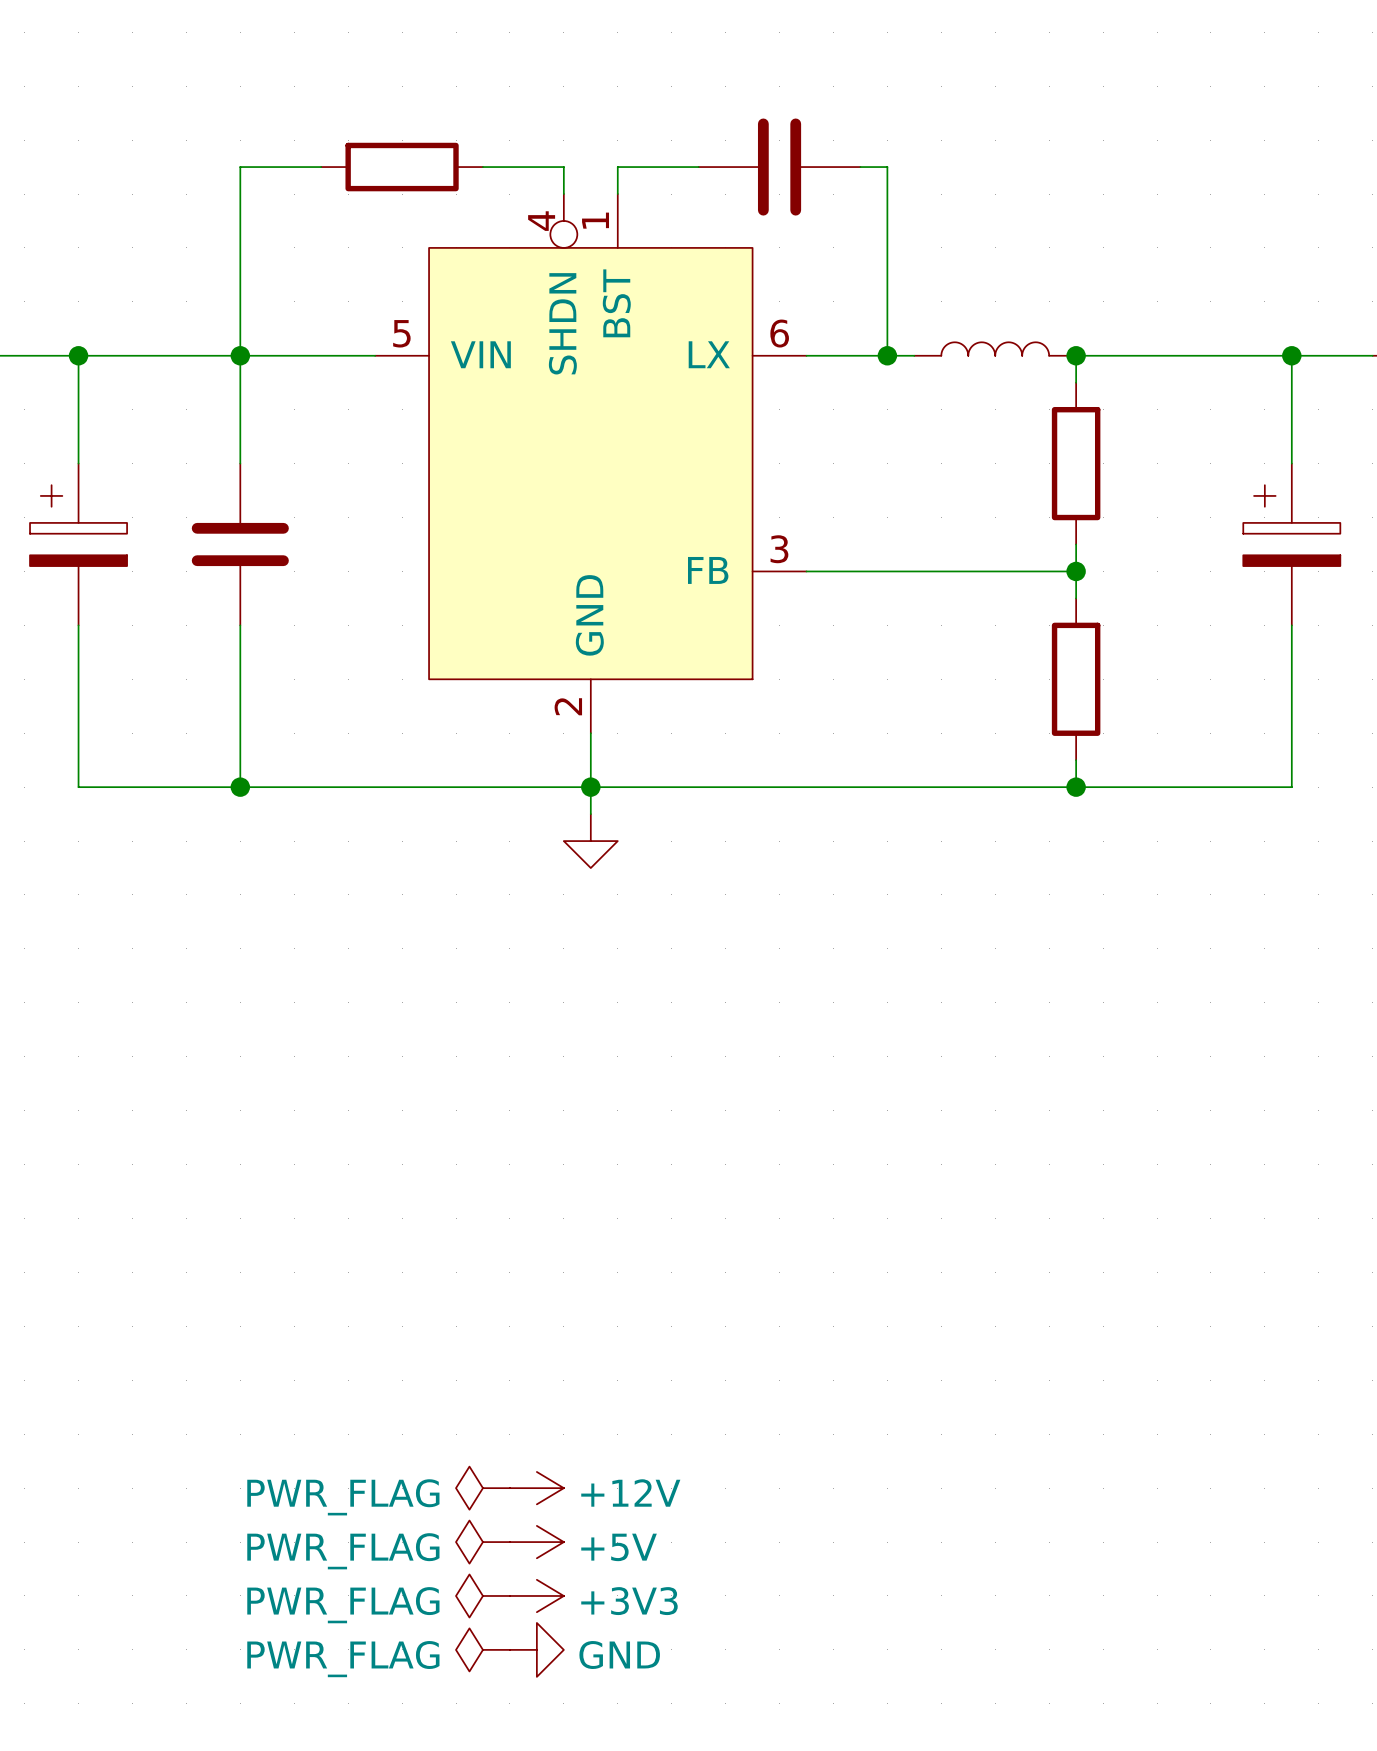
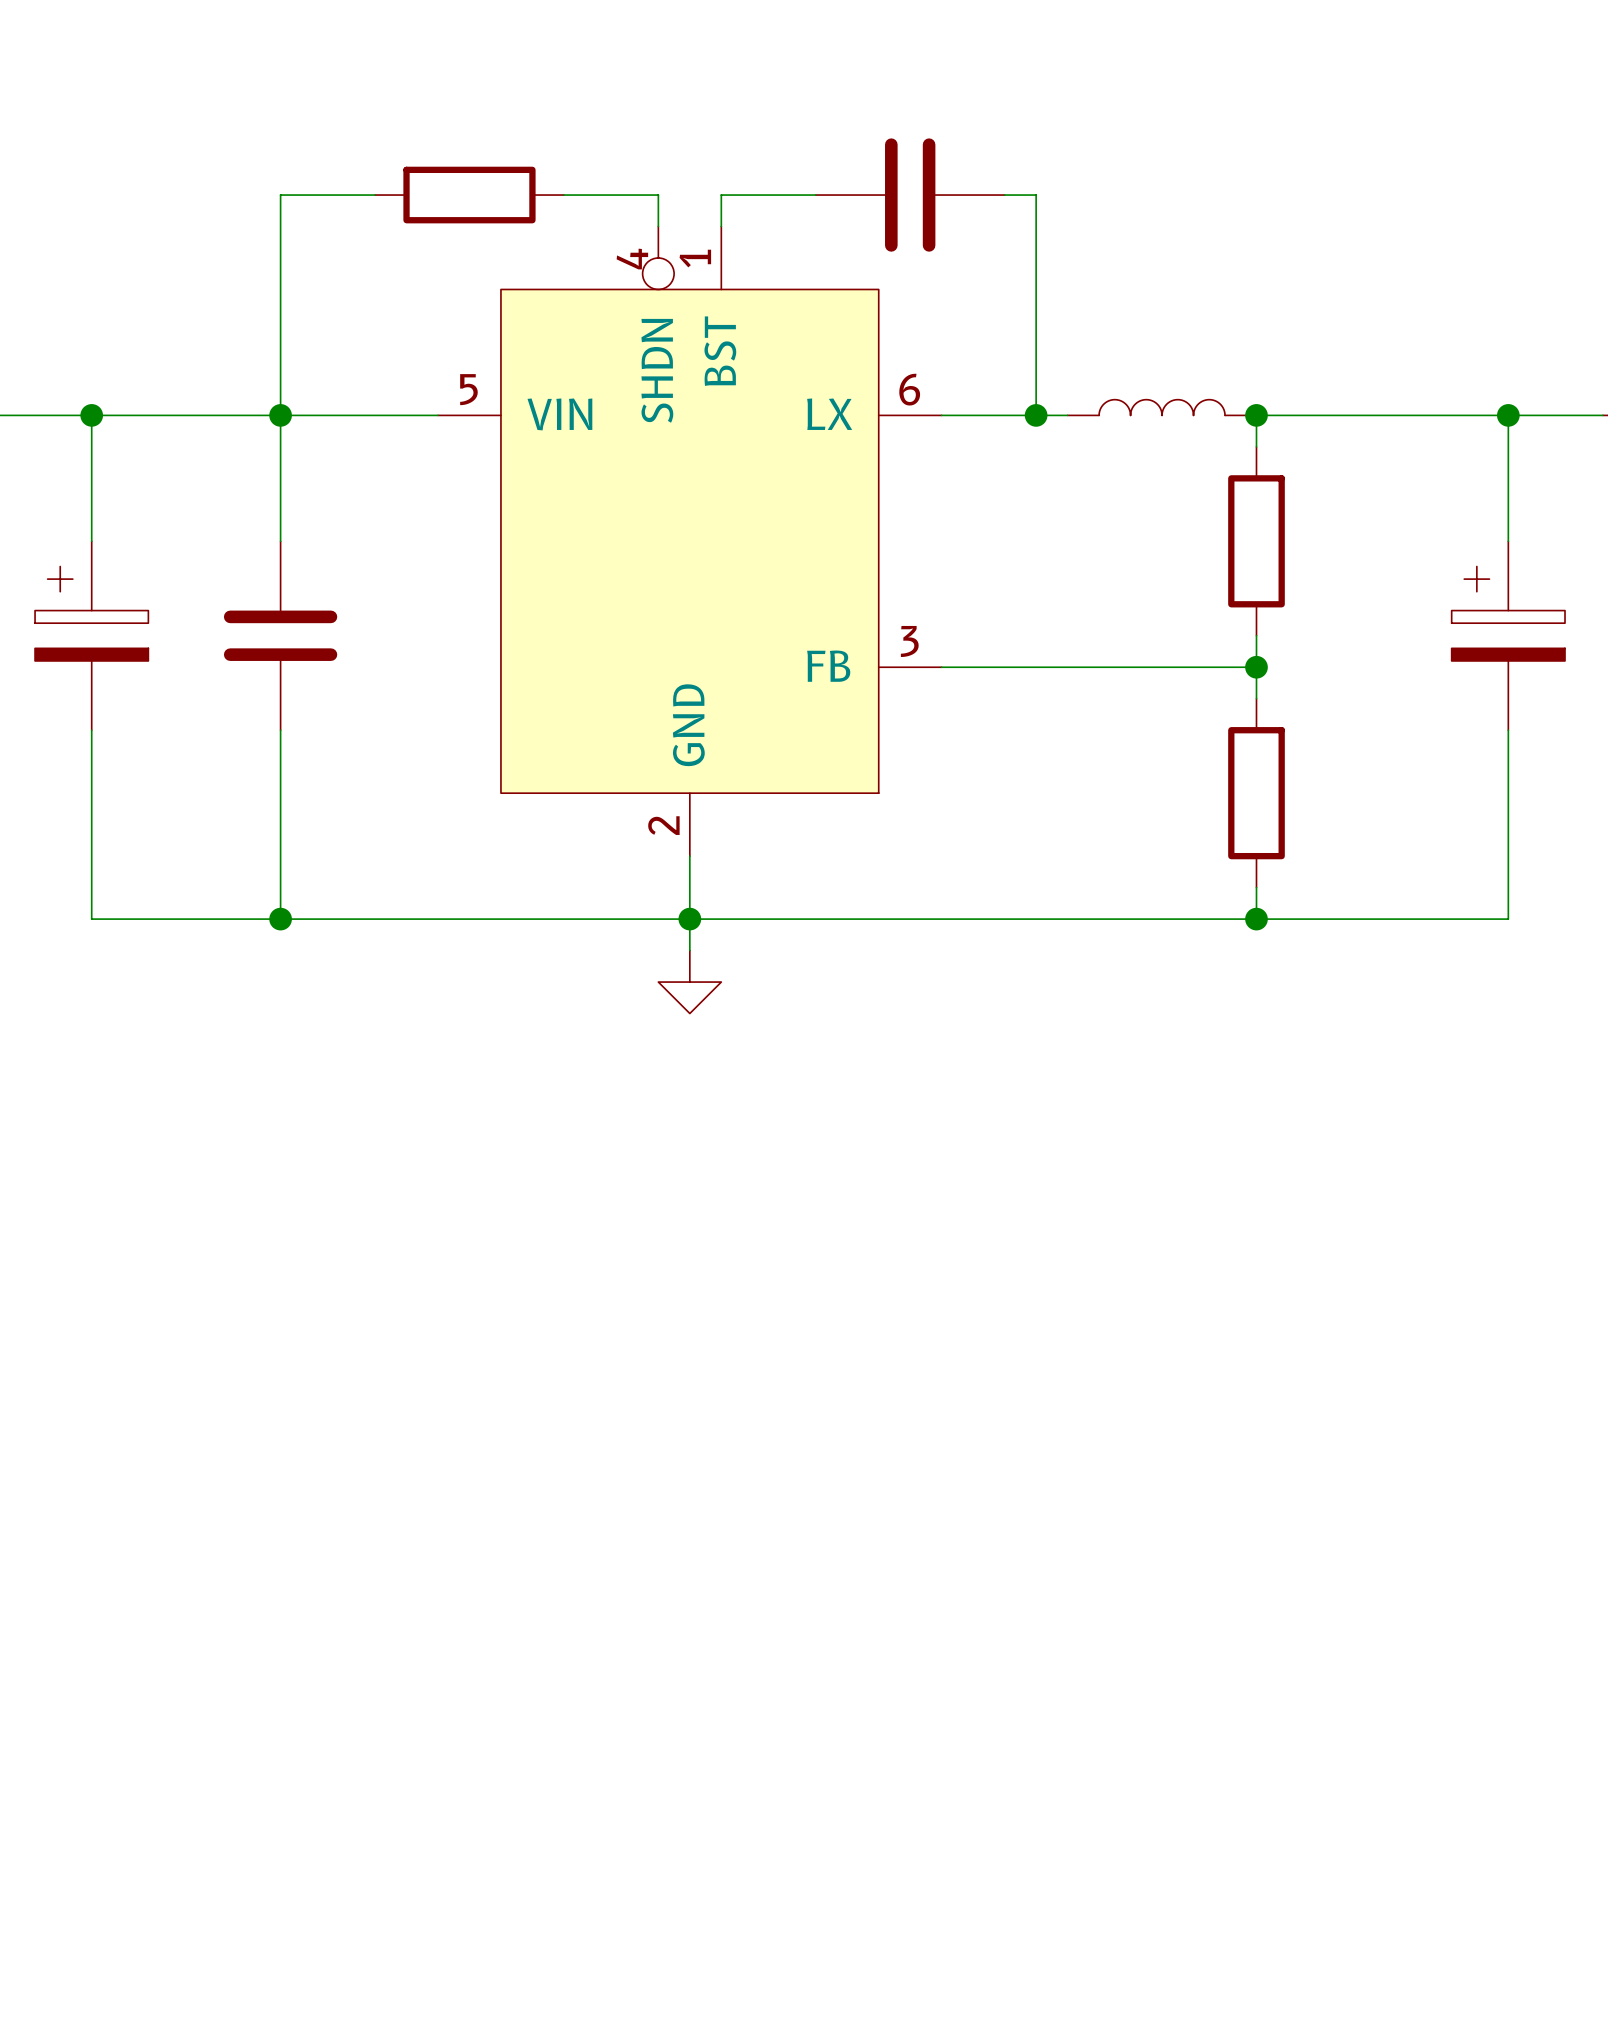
power symbol: PWR_FLAG (482, 1488) -> none
power symbol: +12V (536, 1488) -> none
power symbol: PWR_FLAG (482, 1542) -> none
power symbol: +5V (536, 1542) -> none
power symbol: PWR_FLAG (482, 1595) -> none
power symbol: +3V3 (536, 1595) -> none
power symbol: PWR_FLAG (482, 1649) -> none
power symbol: GND (536, 1649) -> none

